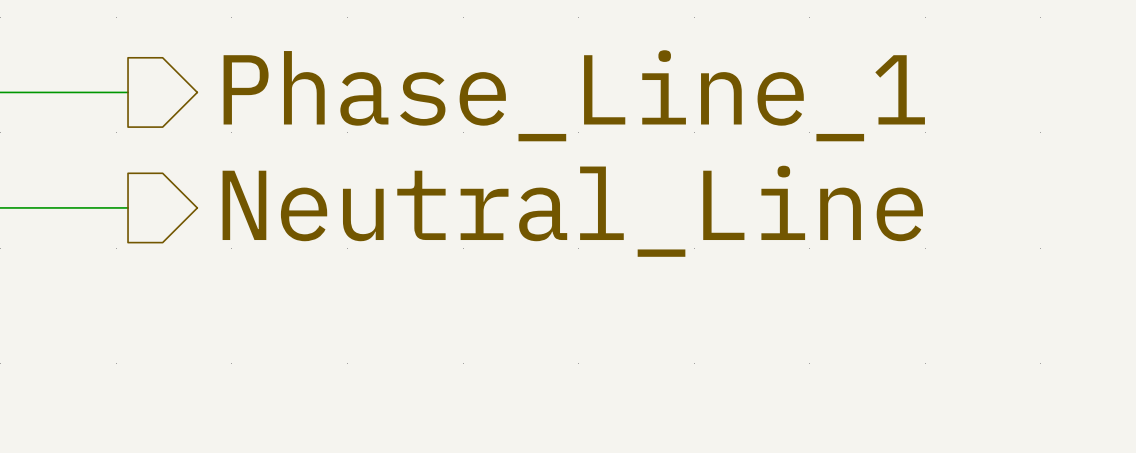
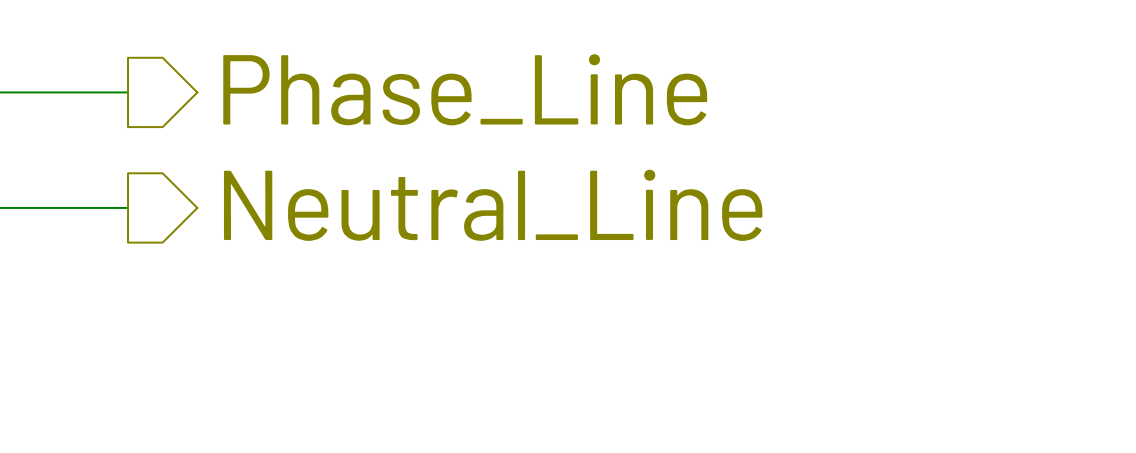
hierarchical label: Phase_Line_1 (574, 95) -> Phase_Line (465, 89)

